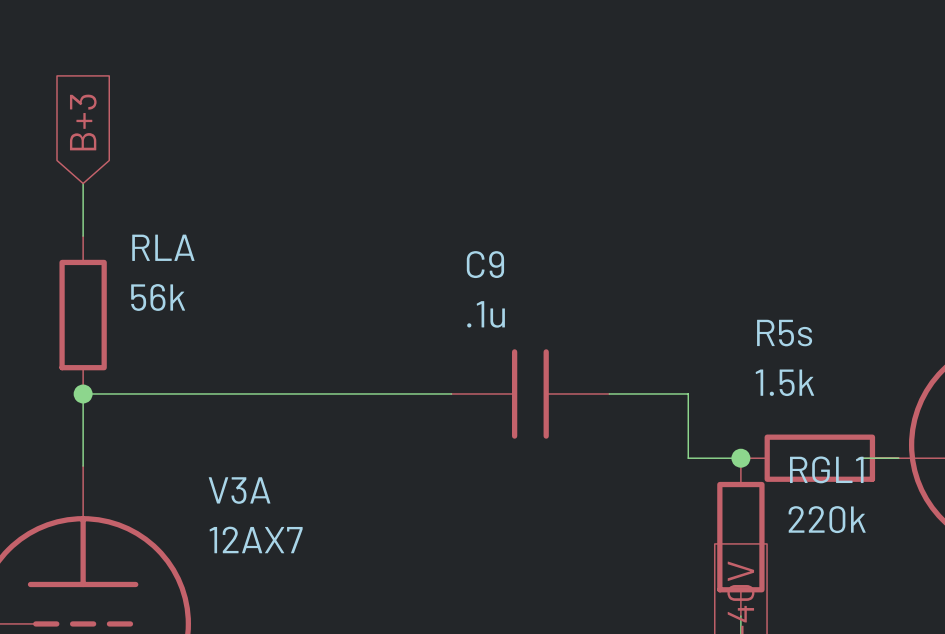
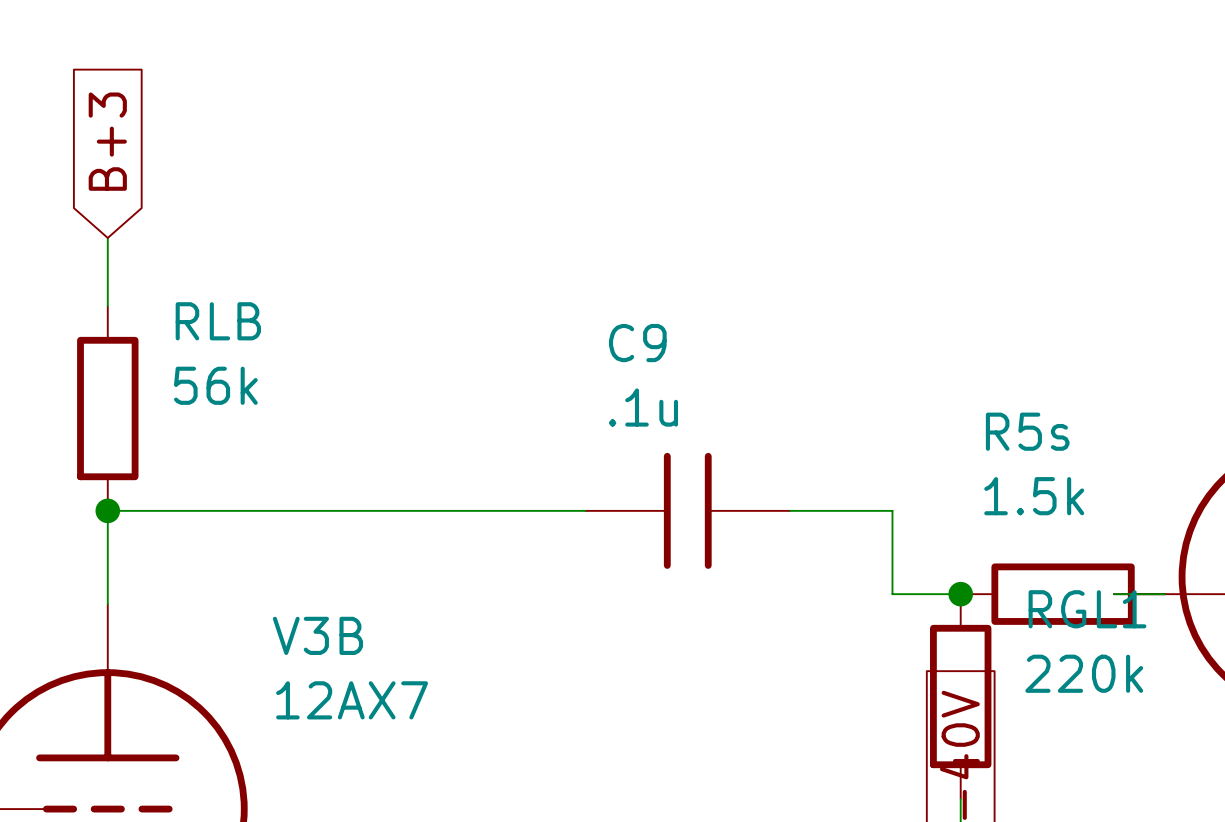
RLA name: RLA (163, 247) -> RLB (218, 321)
V3A name: V3A (239, 490) -> V3B (317, 635)

